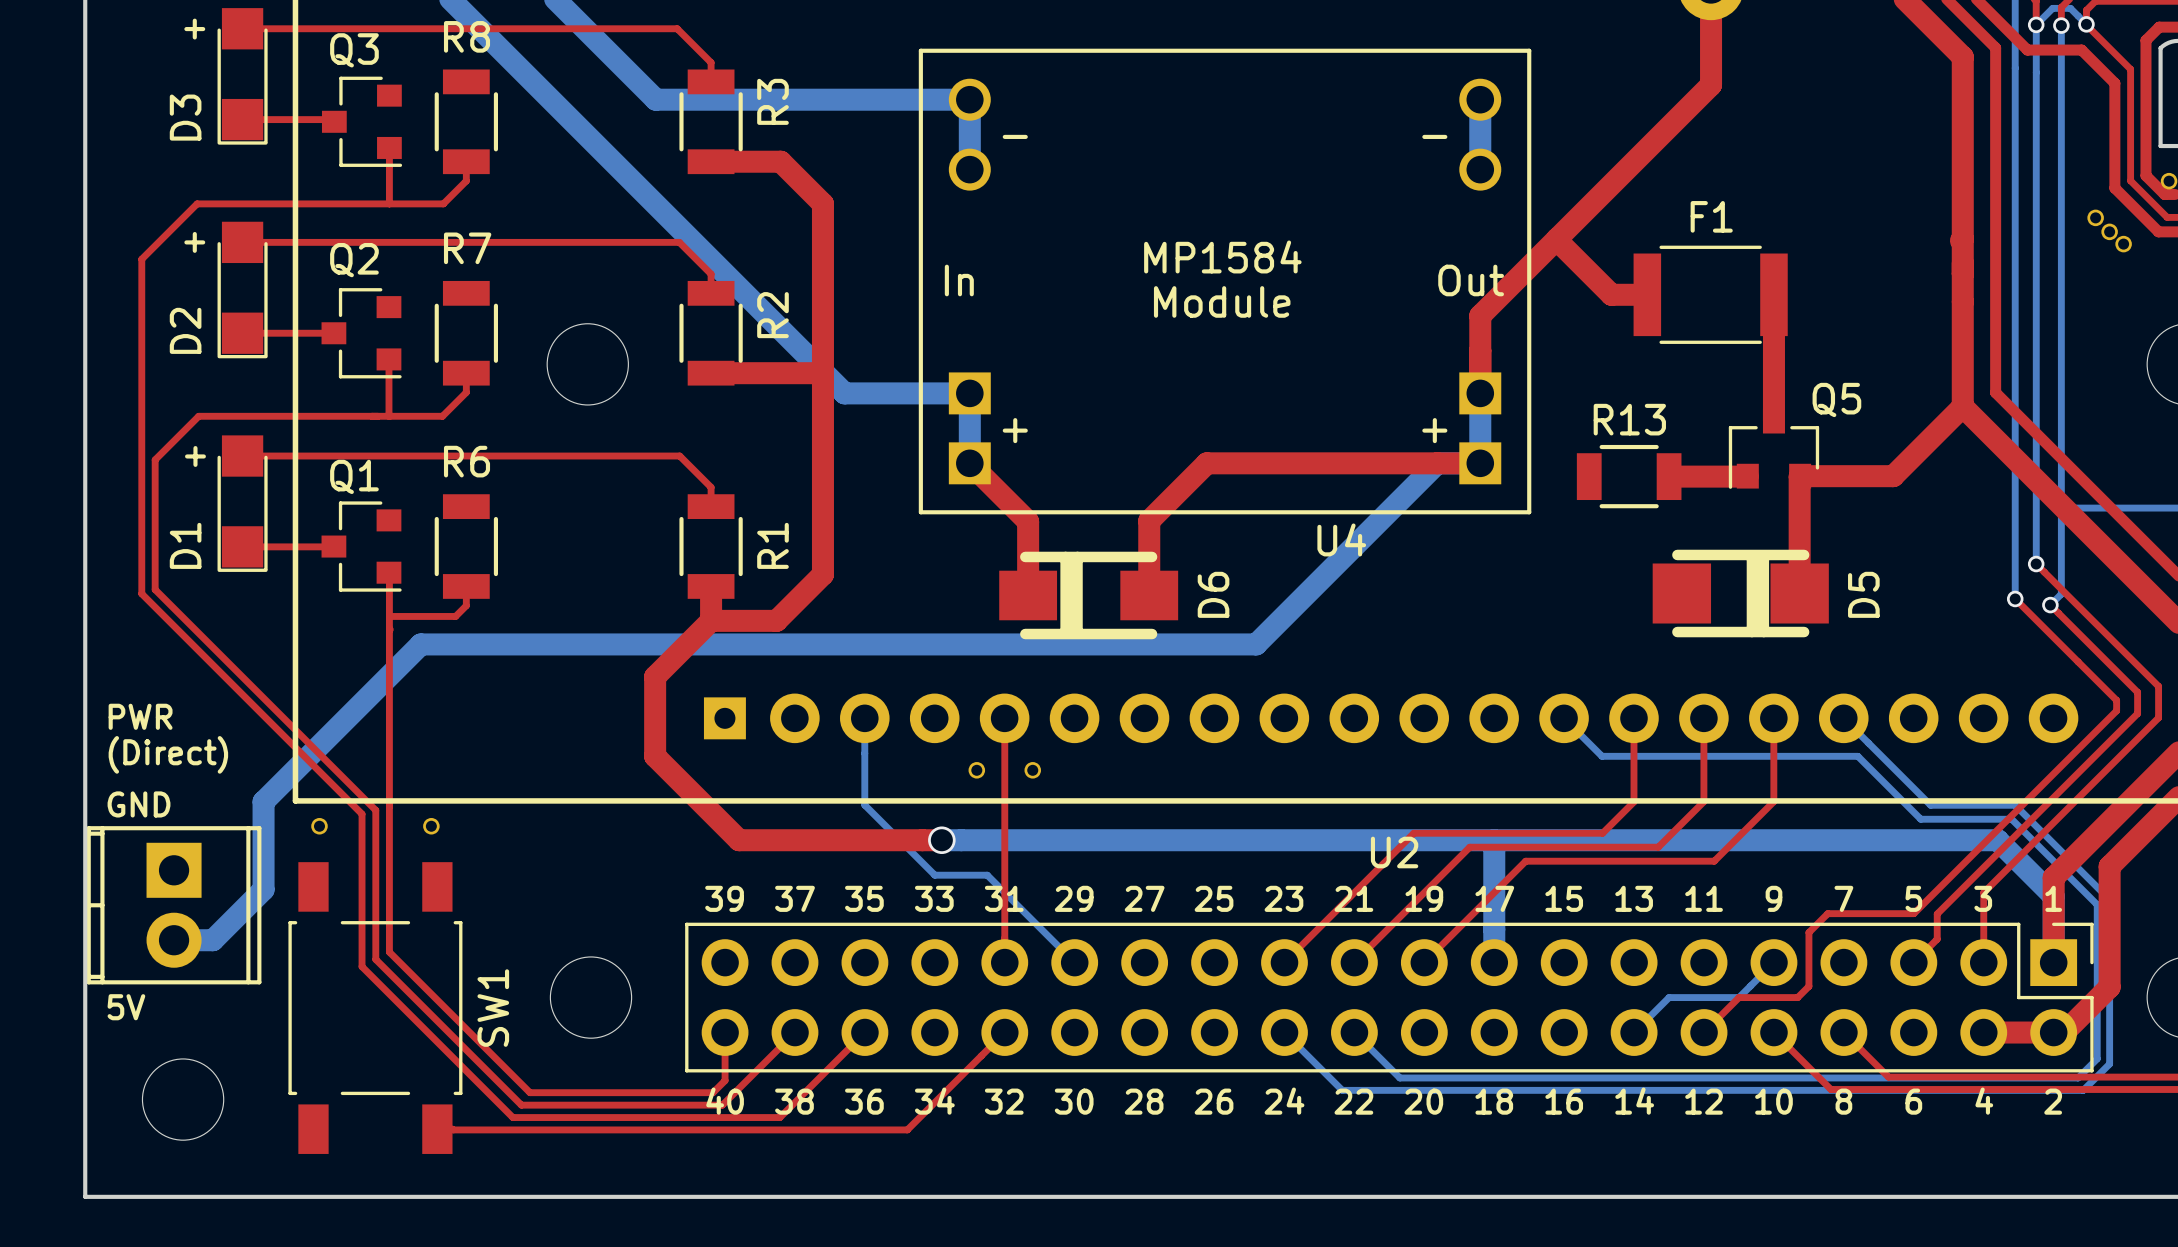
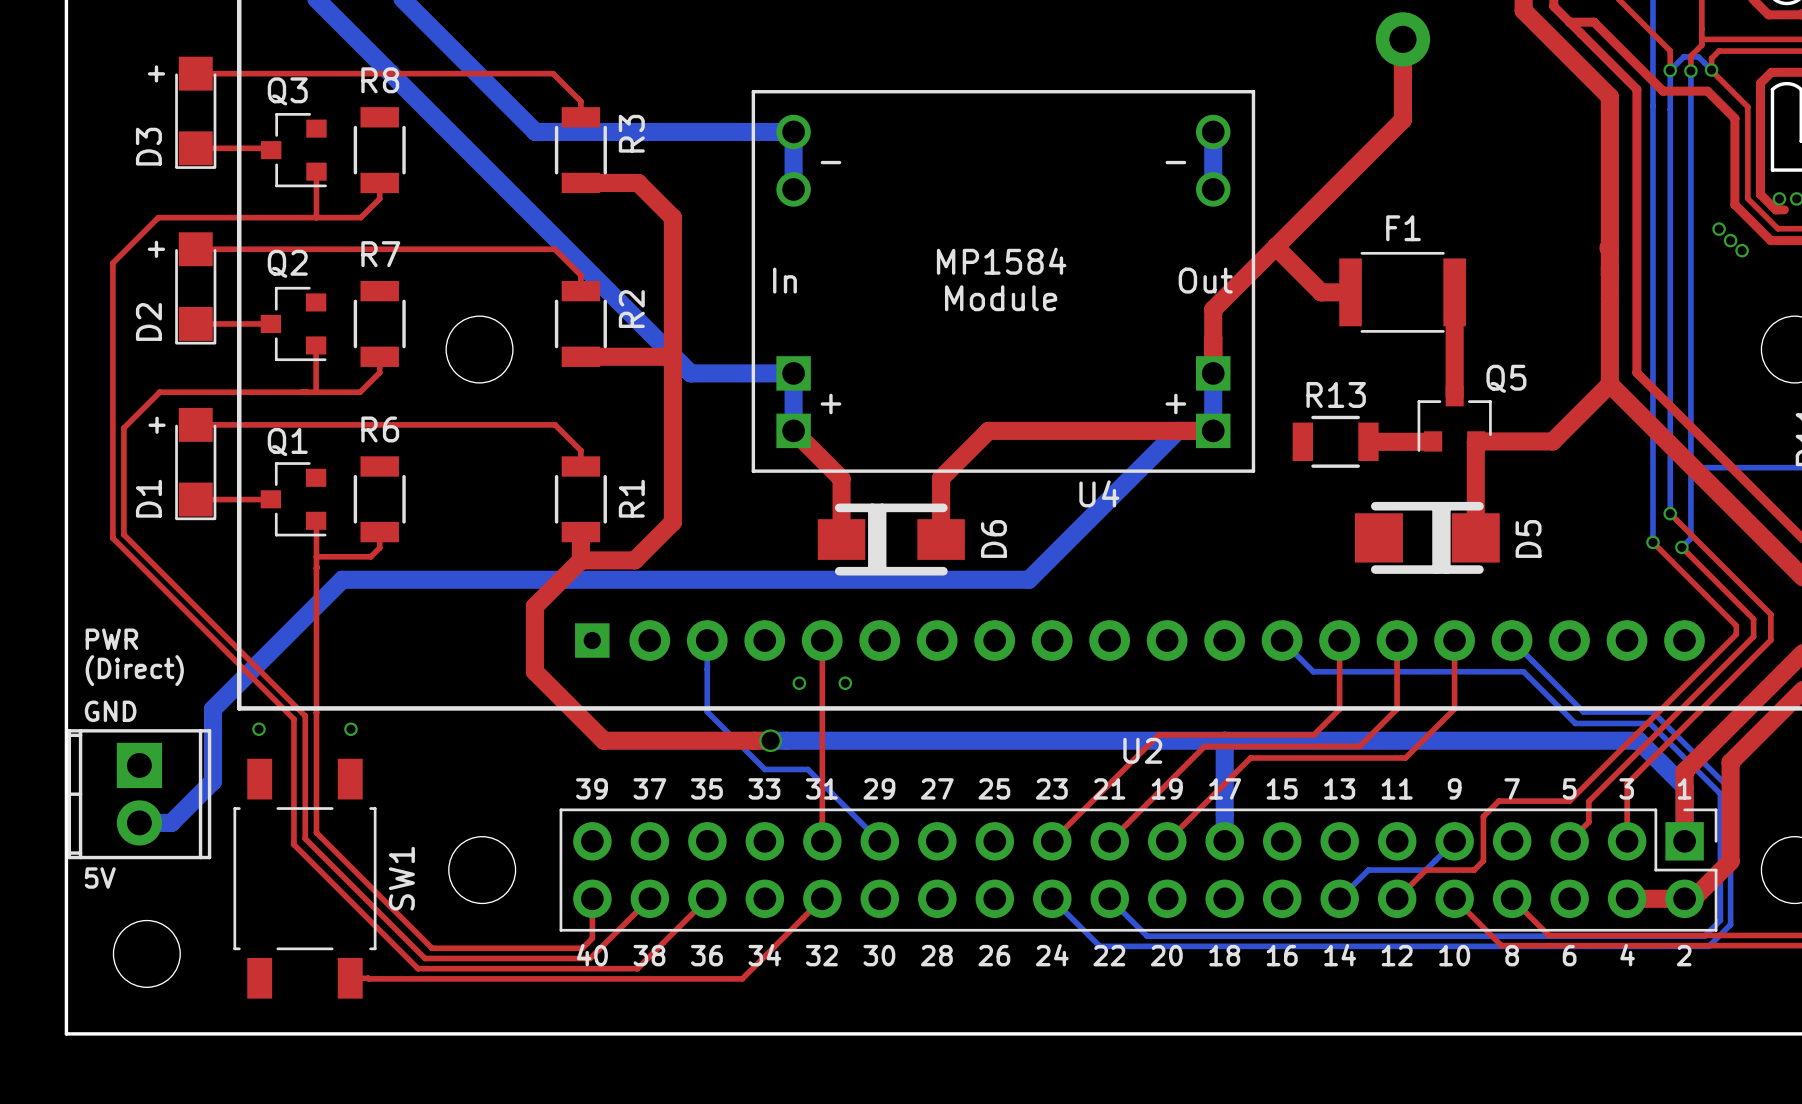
SW1 footprint: [288, 862, 463, 1154] -> [233, 758, 377, 999]

